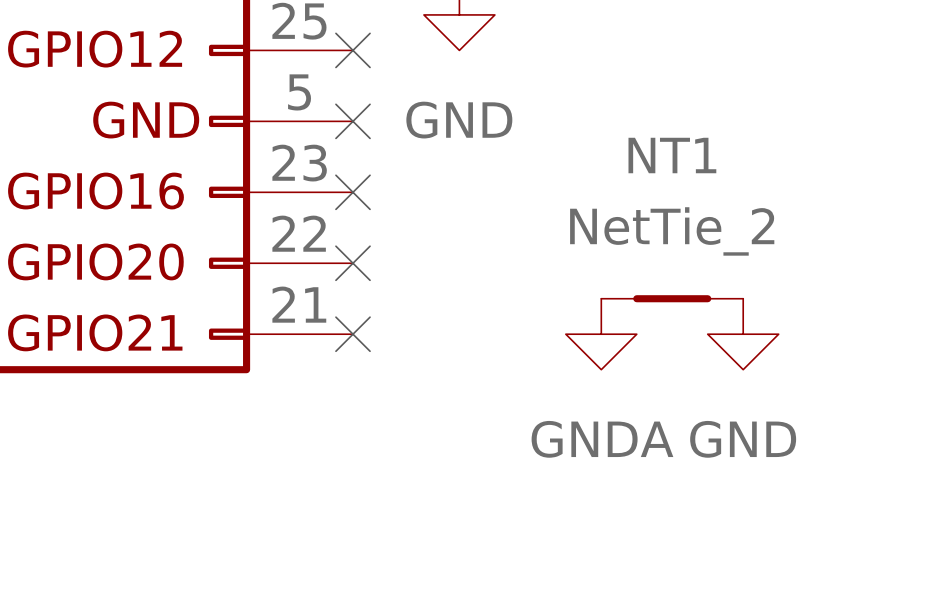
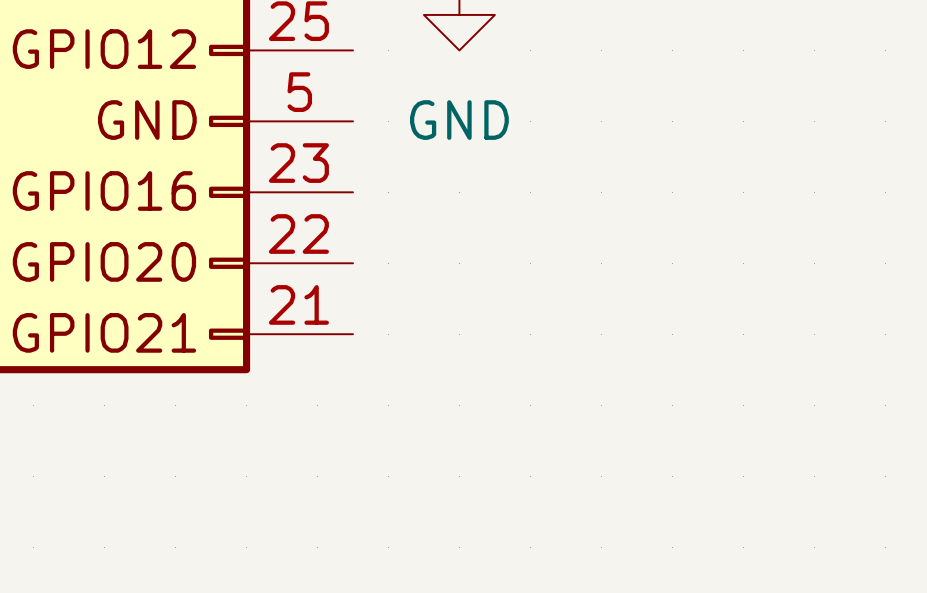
no-connect mark: (352, 50) -> none
no-connect mark: (352, 121) -> none
no-connect mark: (352, 192) -> none
no-connect mark: (352, 263) -> none
NT1: NetTie_2 (672, 298) -> none
no-connect mark: (352, 334) -> none
power symbol: GNDA (601, 334) -> none
power symbol: GND (743, 334) -> none

